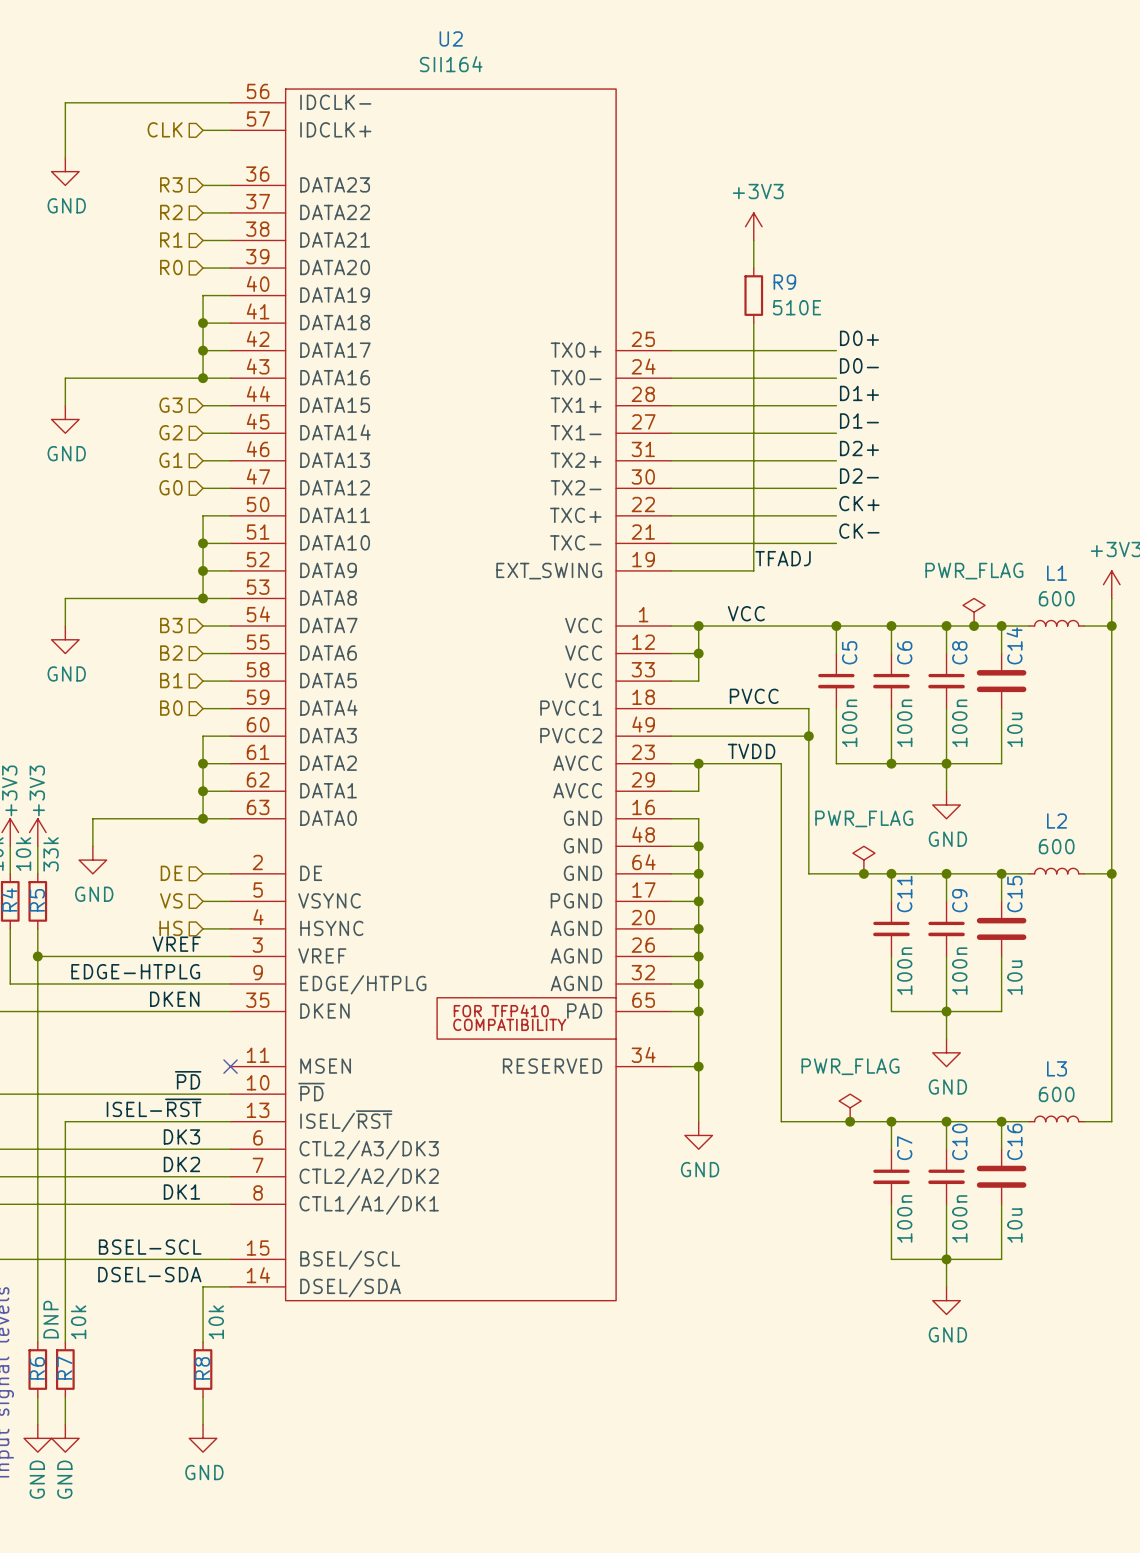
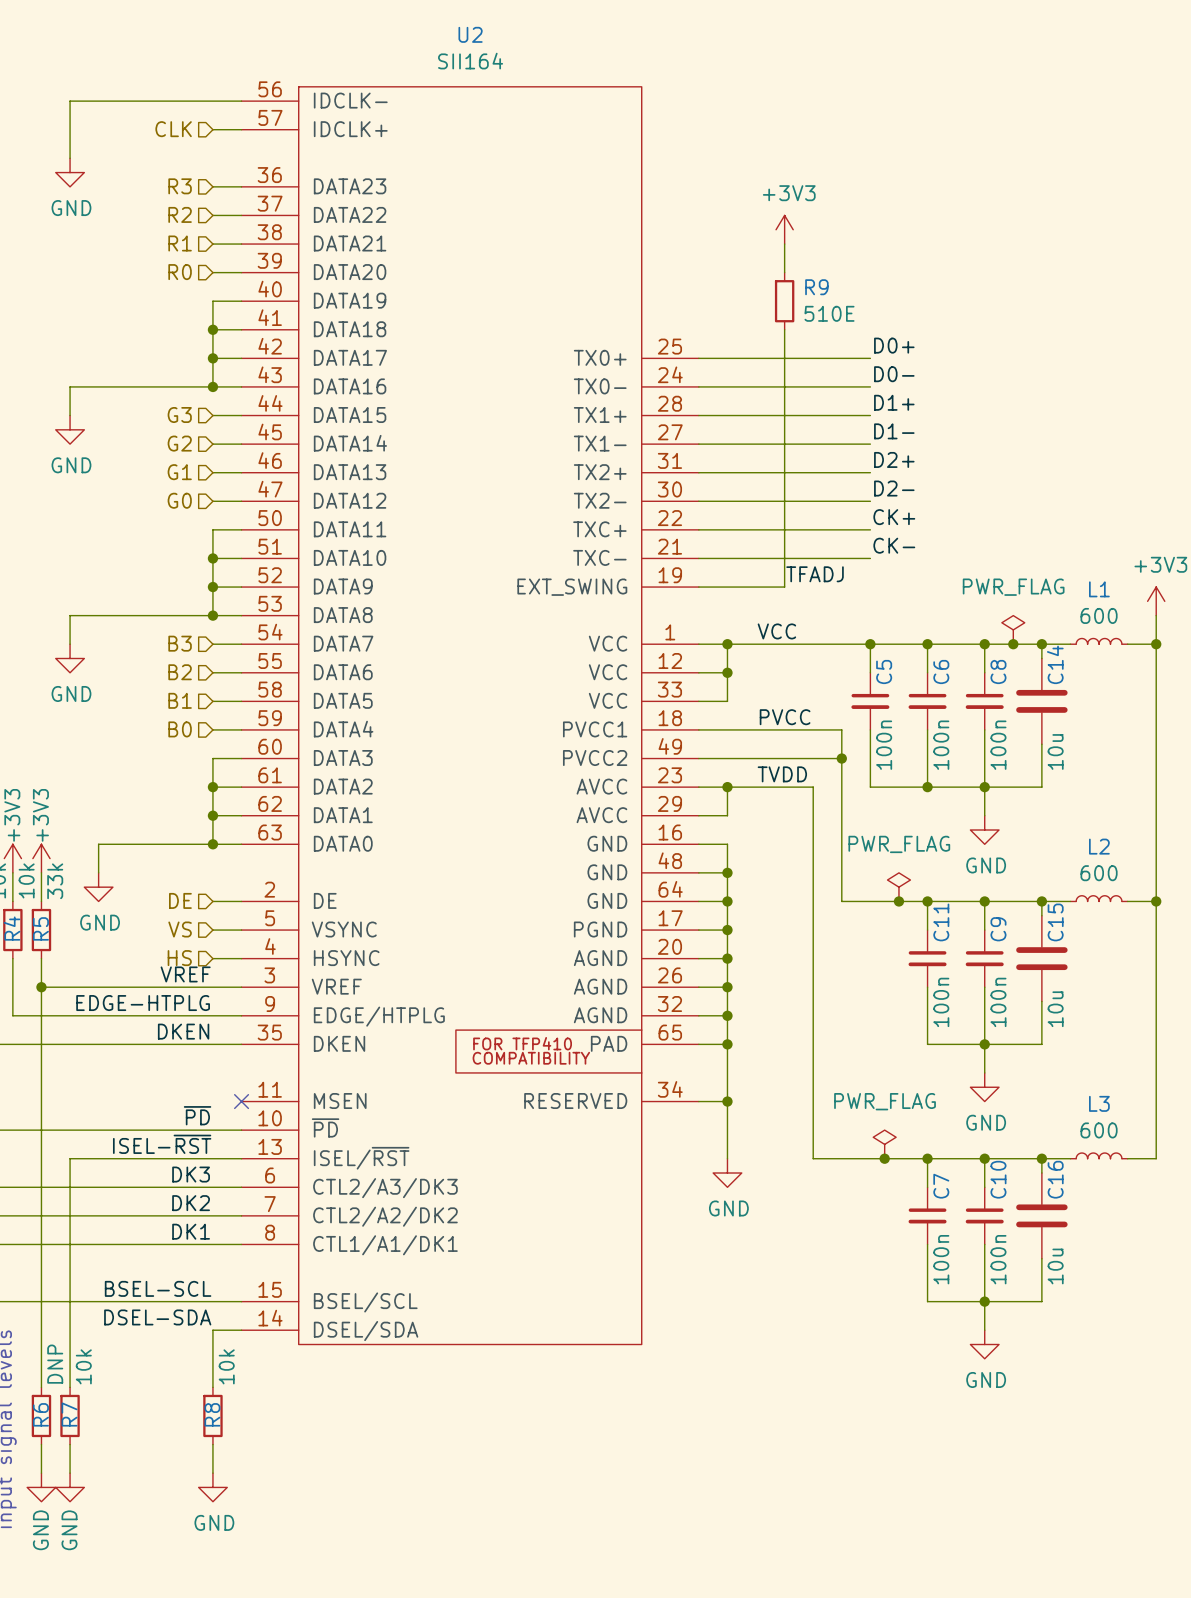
C14 symbol: [976, 653, 1027, 709] -> [1016, 658, 1068, 745]
C15 symbol: [976, 901, 1027, 957] -> [1016, 915, 1068, 1002]
C16 symbol: [976, 1149, 1027, 1205] -> [1016, 1173, 1068, 1259]

